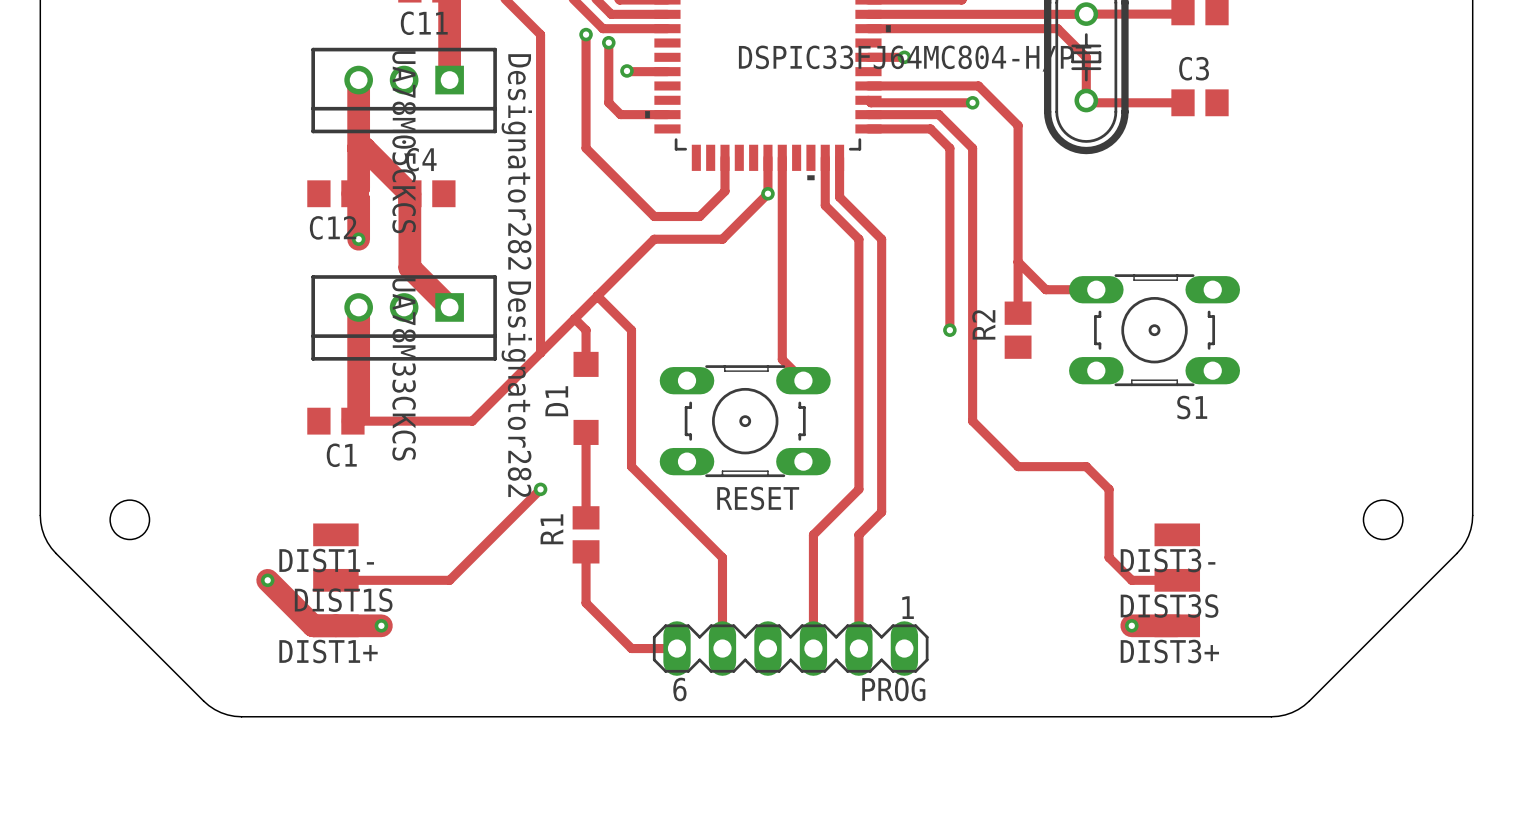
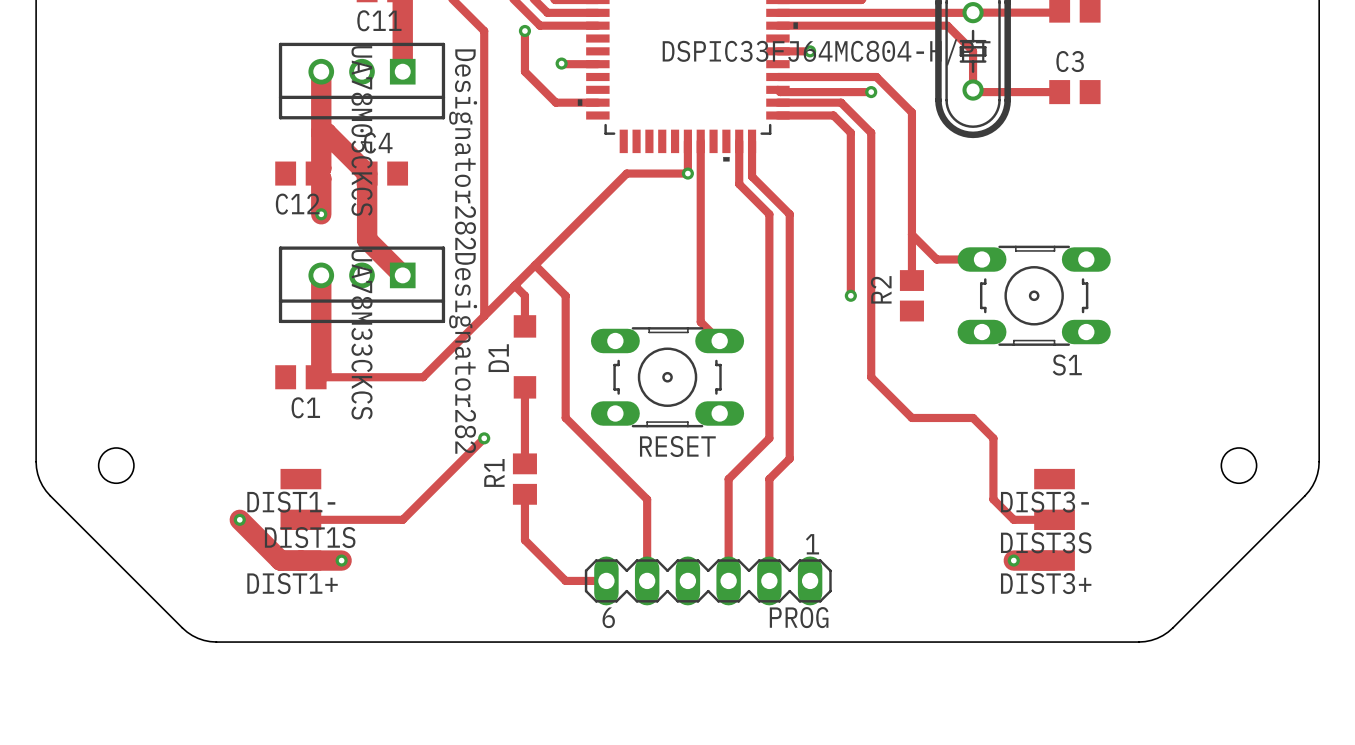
track: (608, 42) (608, 102) -> (524, 71) (545, 92)
via: (608, 42) -> none
track: (586, 80) (586, 148) (654, 216) (699, 216) (724, 191) (724, 157) -> none
track: (767, 193) (722, 239) (654, 239) -> (687, 173) (626, 173) (586, 214)

